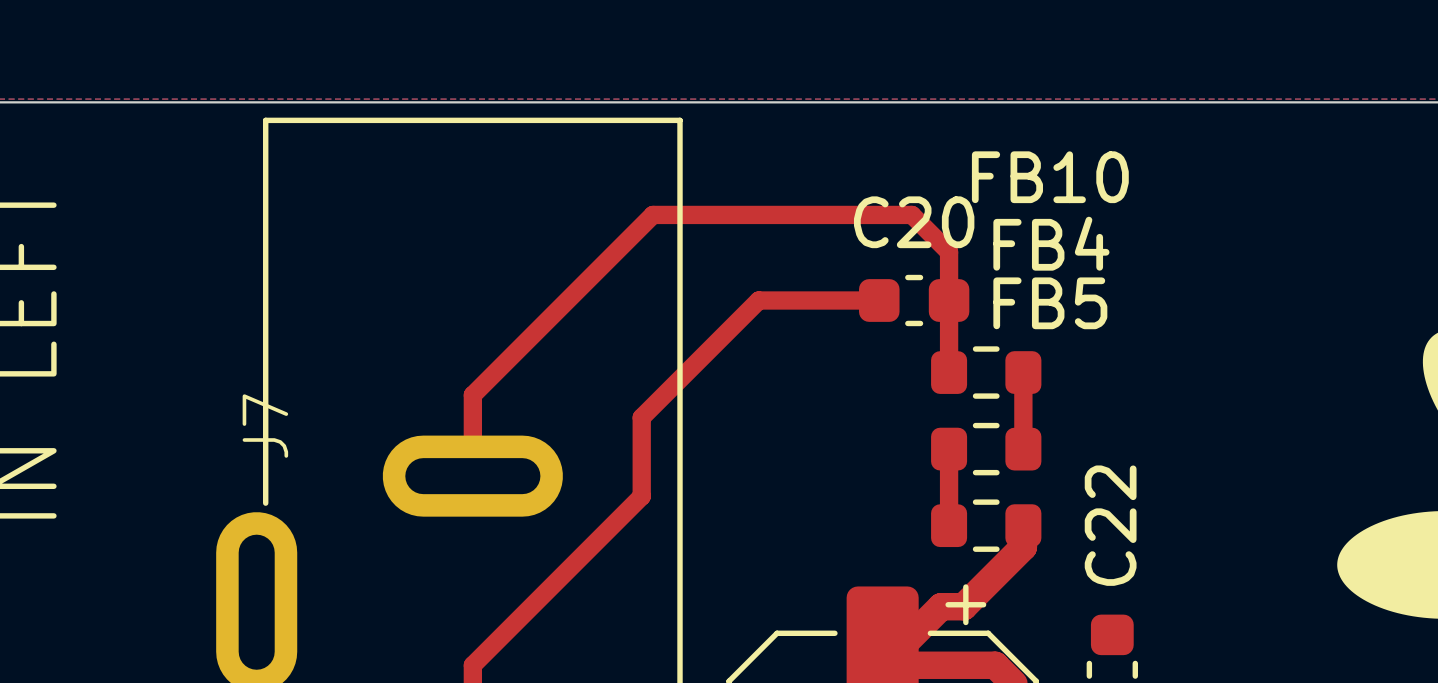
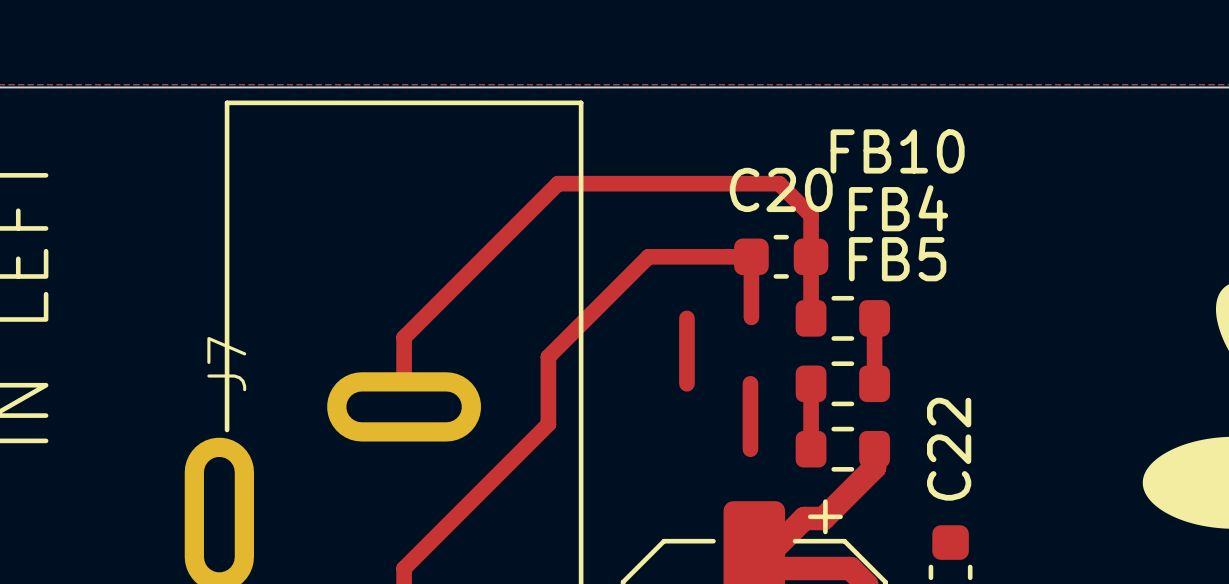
top track: none -> (751, 256) (751, 317)
top track: none -> (686, 318) (686, 383)
top track: none -> (750, 383) (750, 449)

